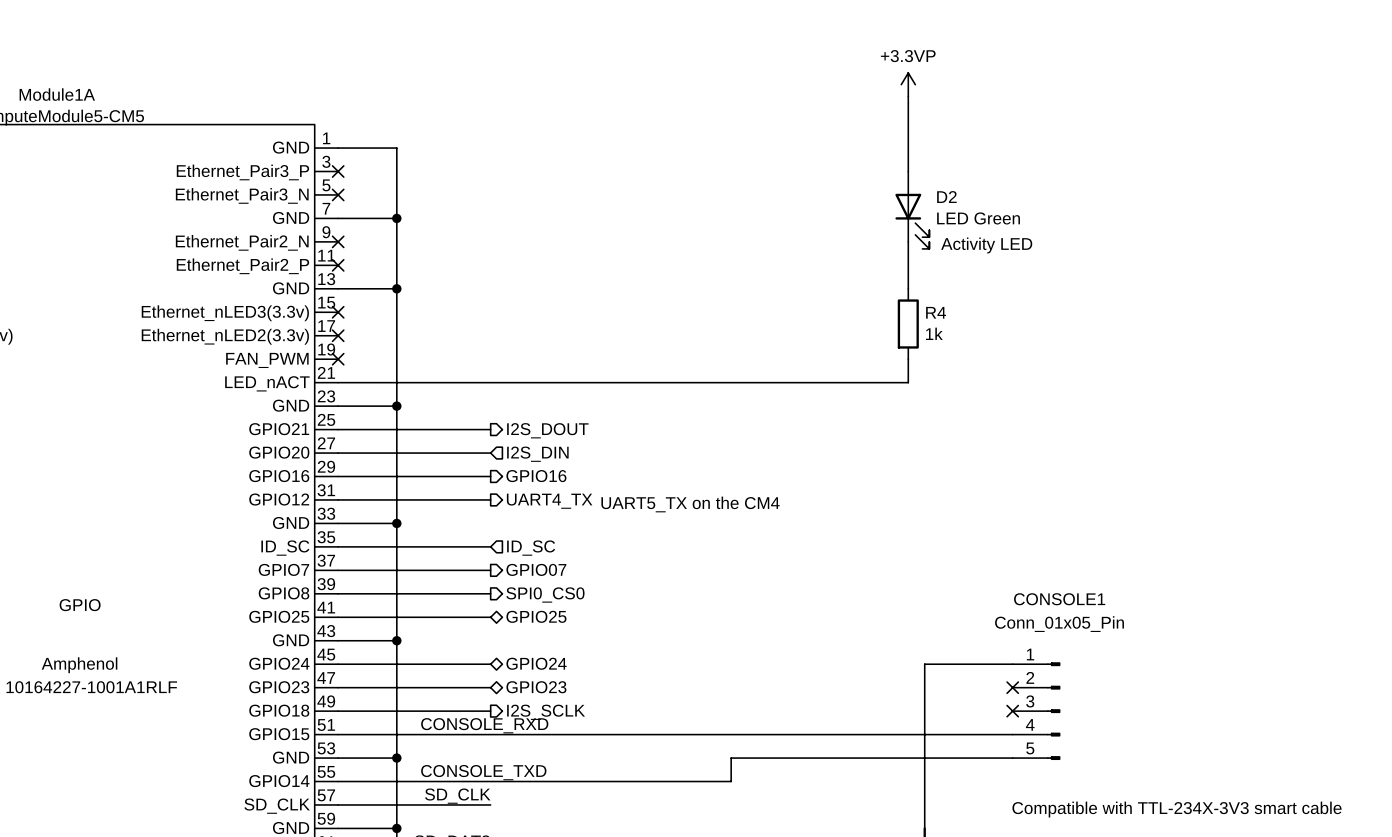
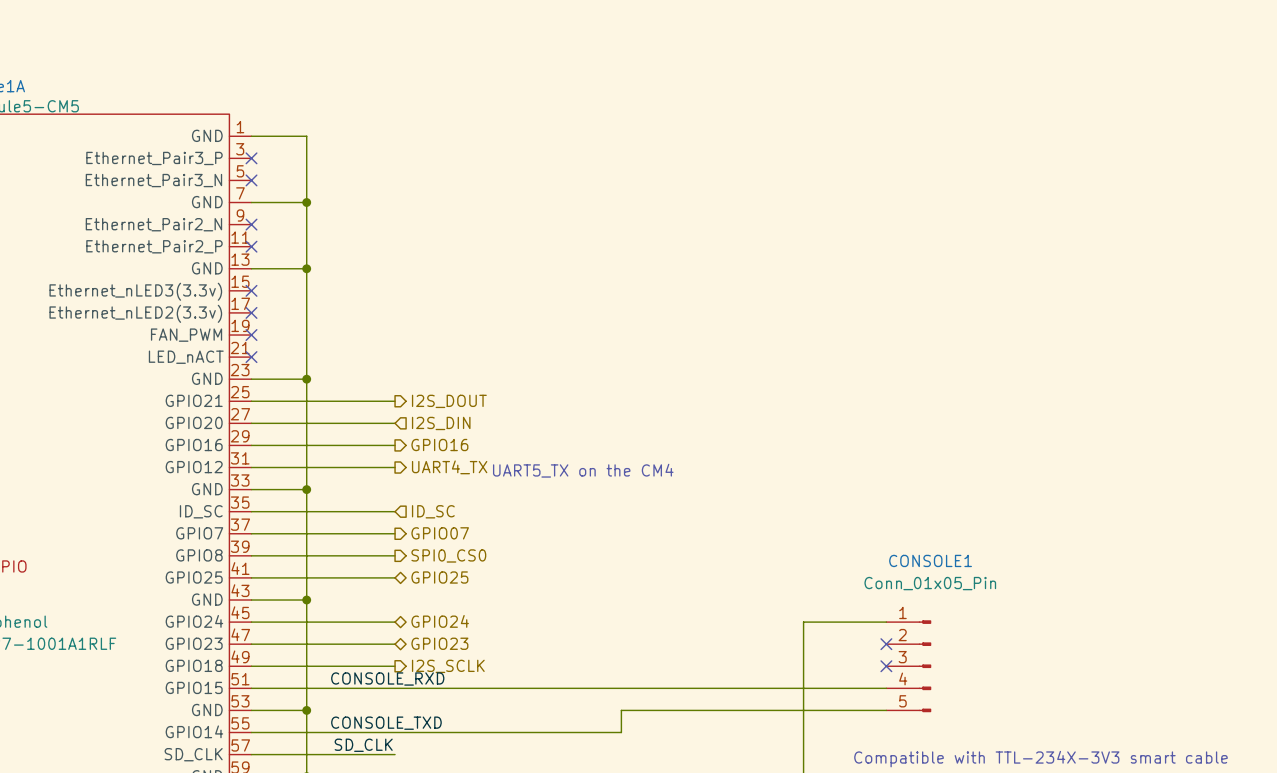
power symbol: +3.3VP (908, 84) -> none
wire: (908, 96) (908, 171) -> none
D2: LED Green (912, 210) -> none
wire: (908, 241) (908, 288) -> none
text: Activity LED (986, 245) -> none
R4: 1k (908, 324) -> none
wire: (908, 359) (908, 382) (338, 382) -> none
no-connect mark: none -> (251, 357)

